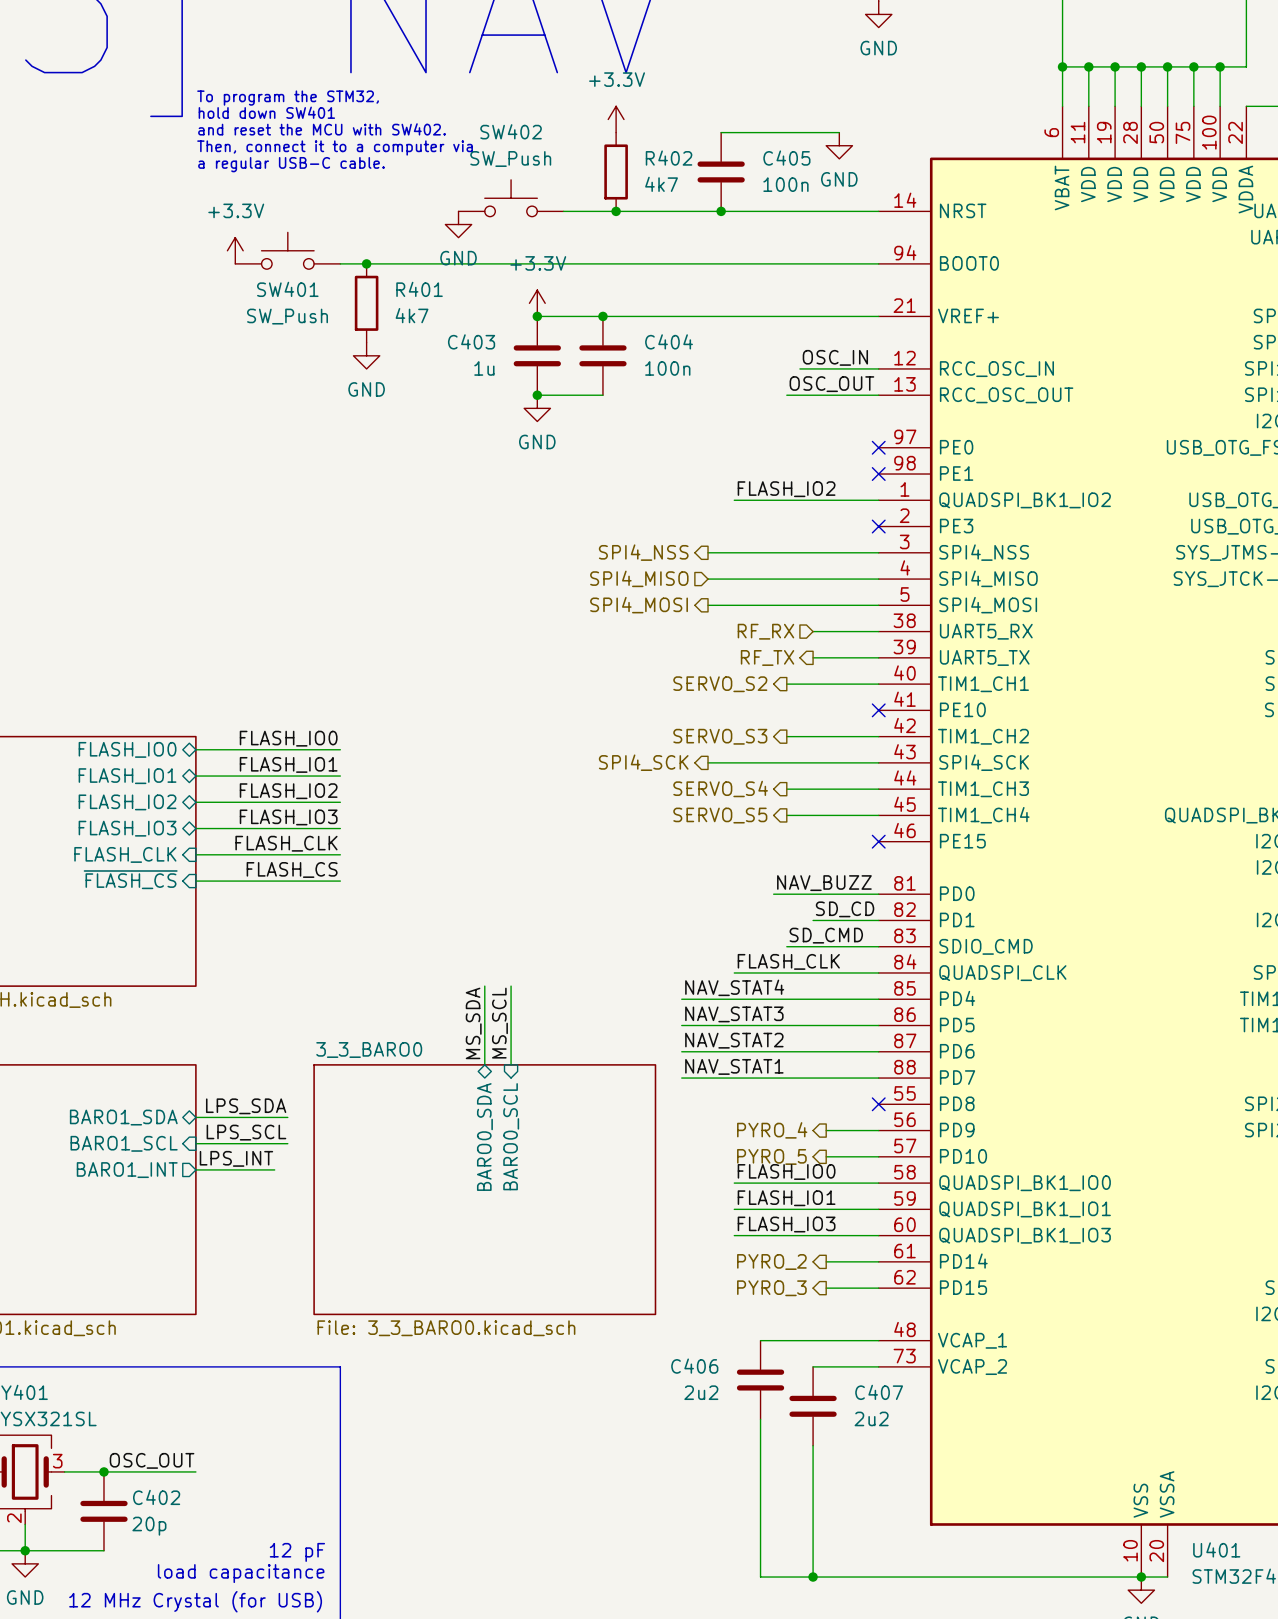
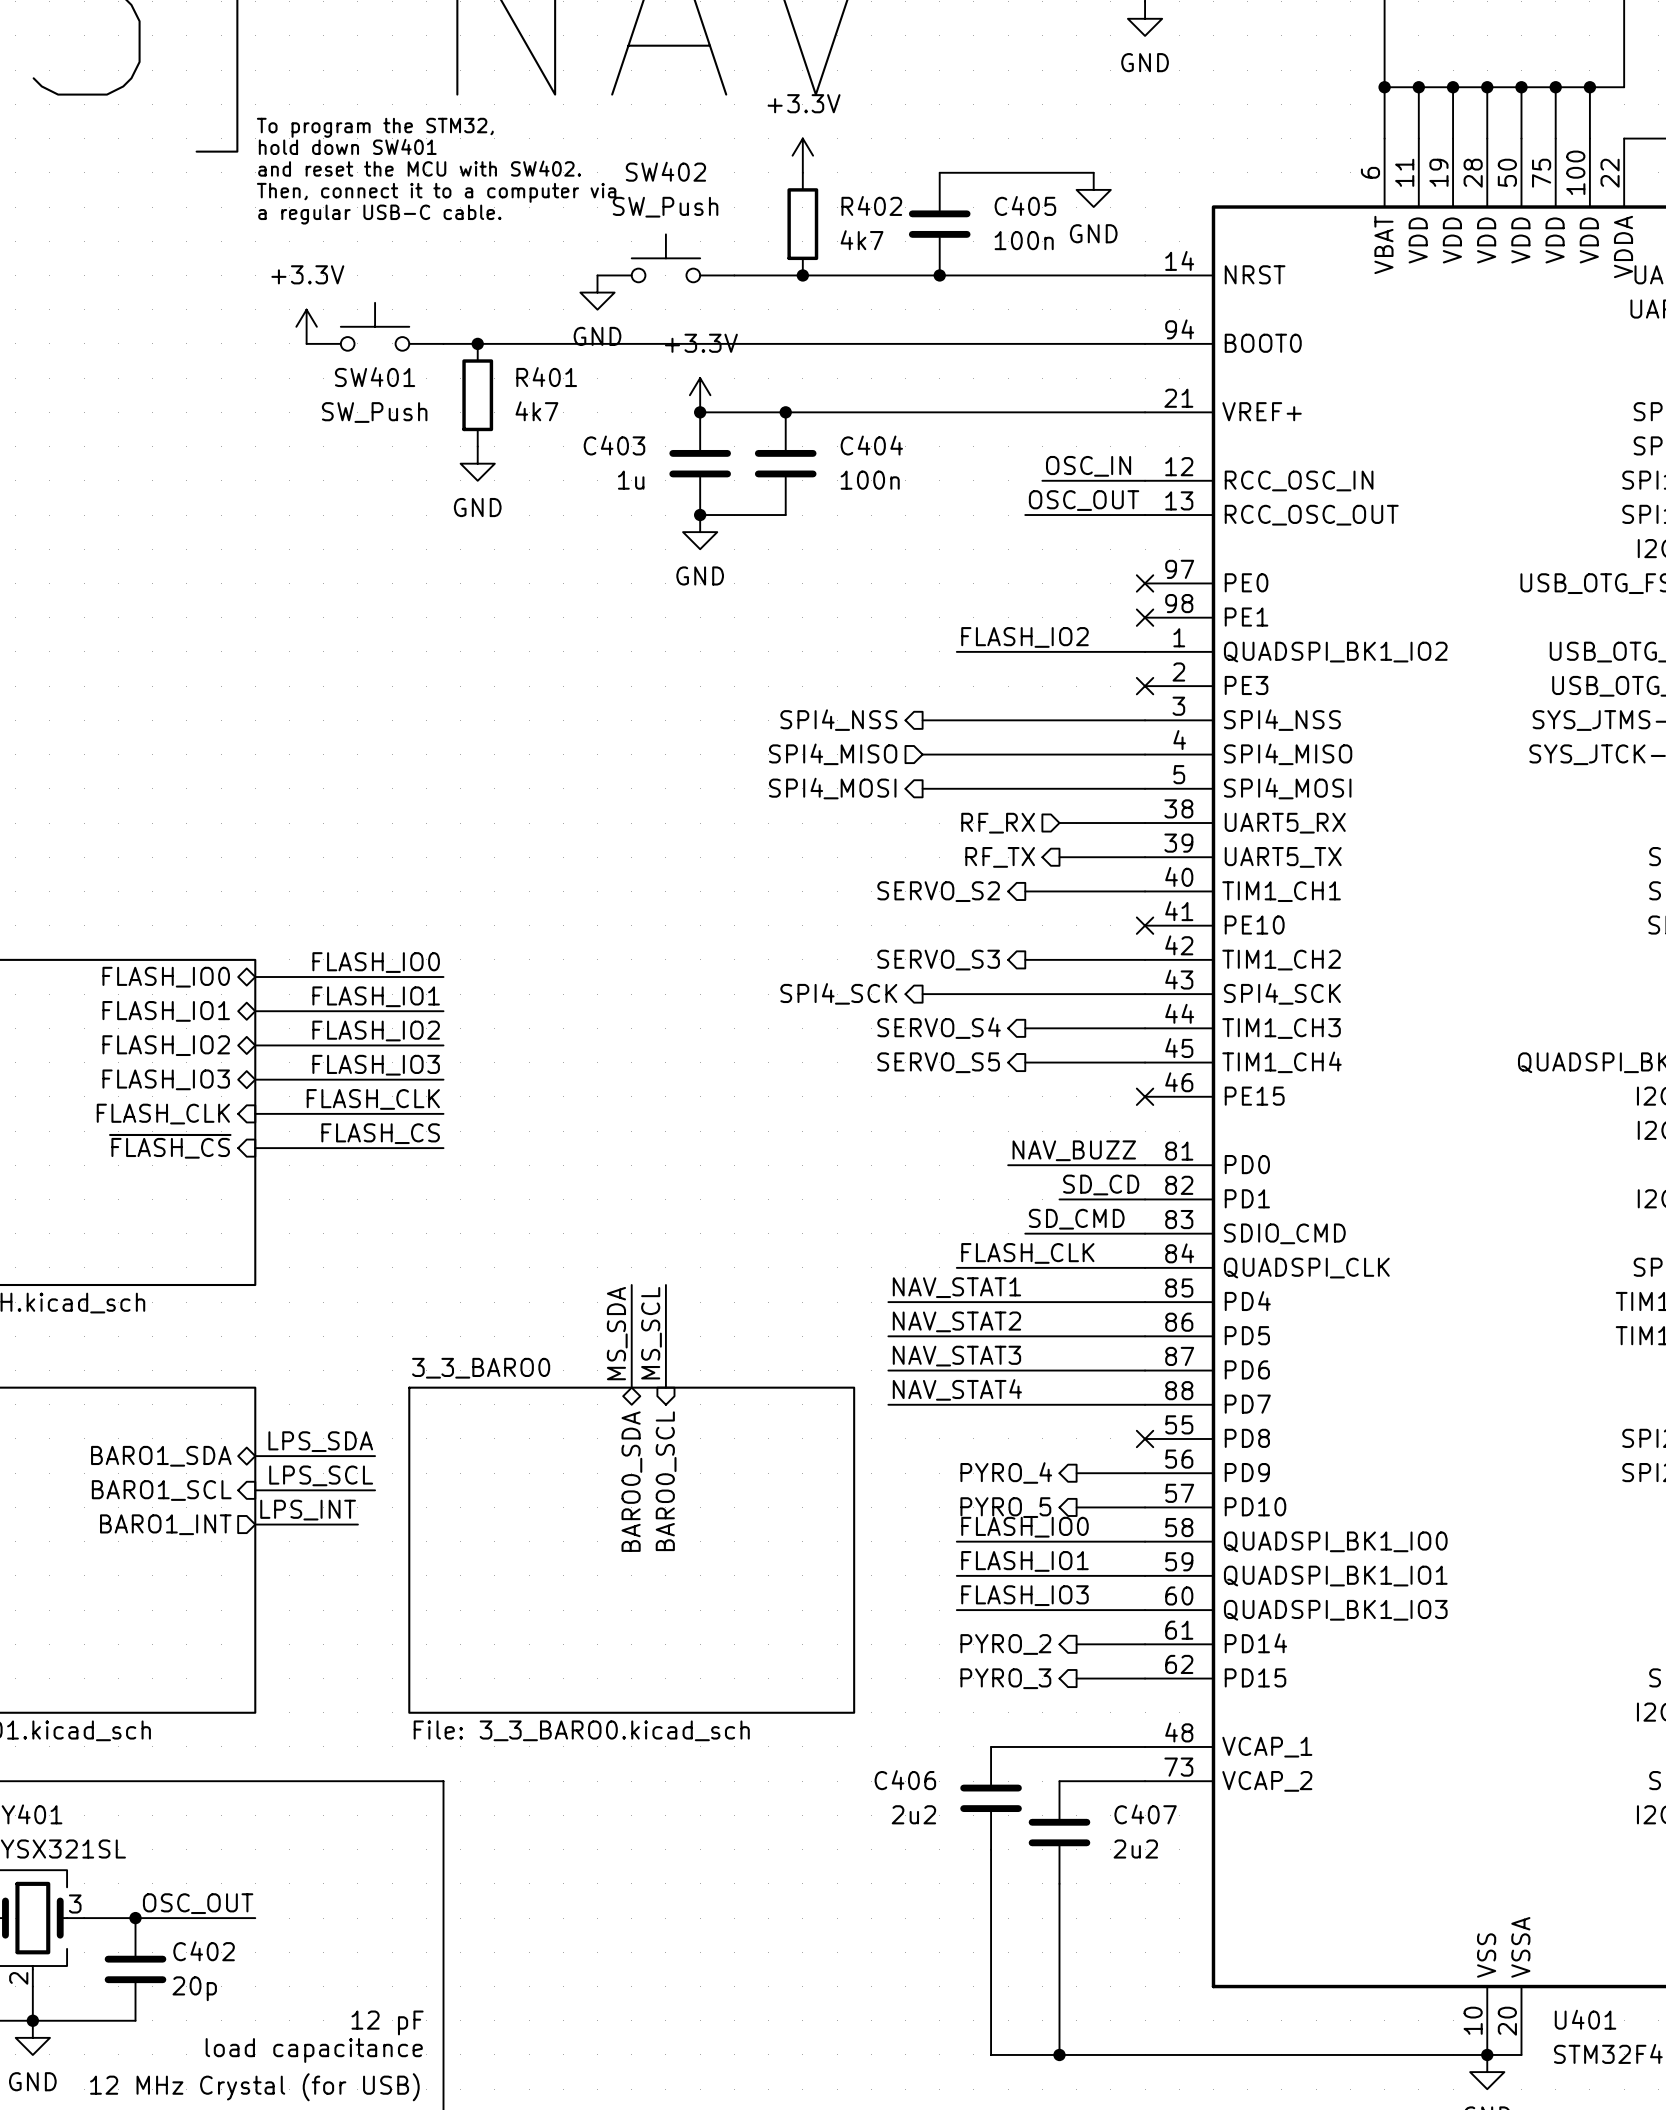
label: NAV_STAT4 (734, 987) -> NAV_STAT1 (956, 1287)
label: NAV_STAT3 (734, 1014) -> NAV_STAT2 (956, 1321)
label: NAV_STAT2 (734, 1040) -> NAV_STAT3 (956, 1356)
label: NAV_STAT1 (734, 1066) -> NAV_STAT4 (957, 1389)

